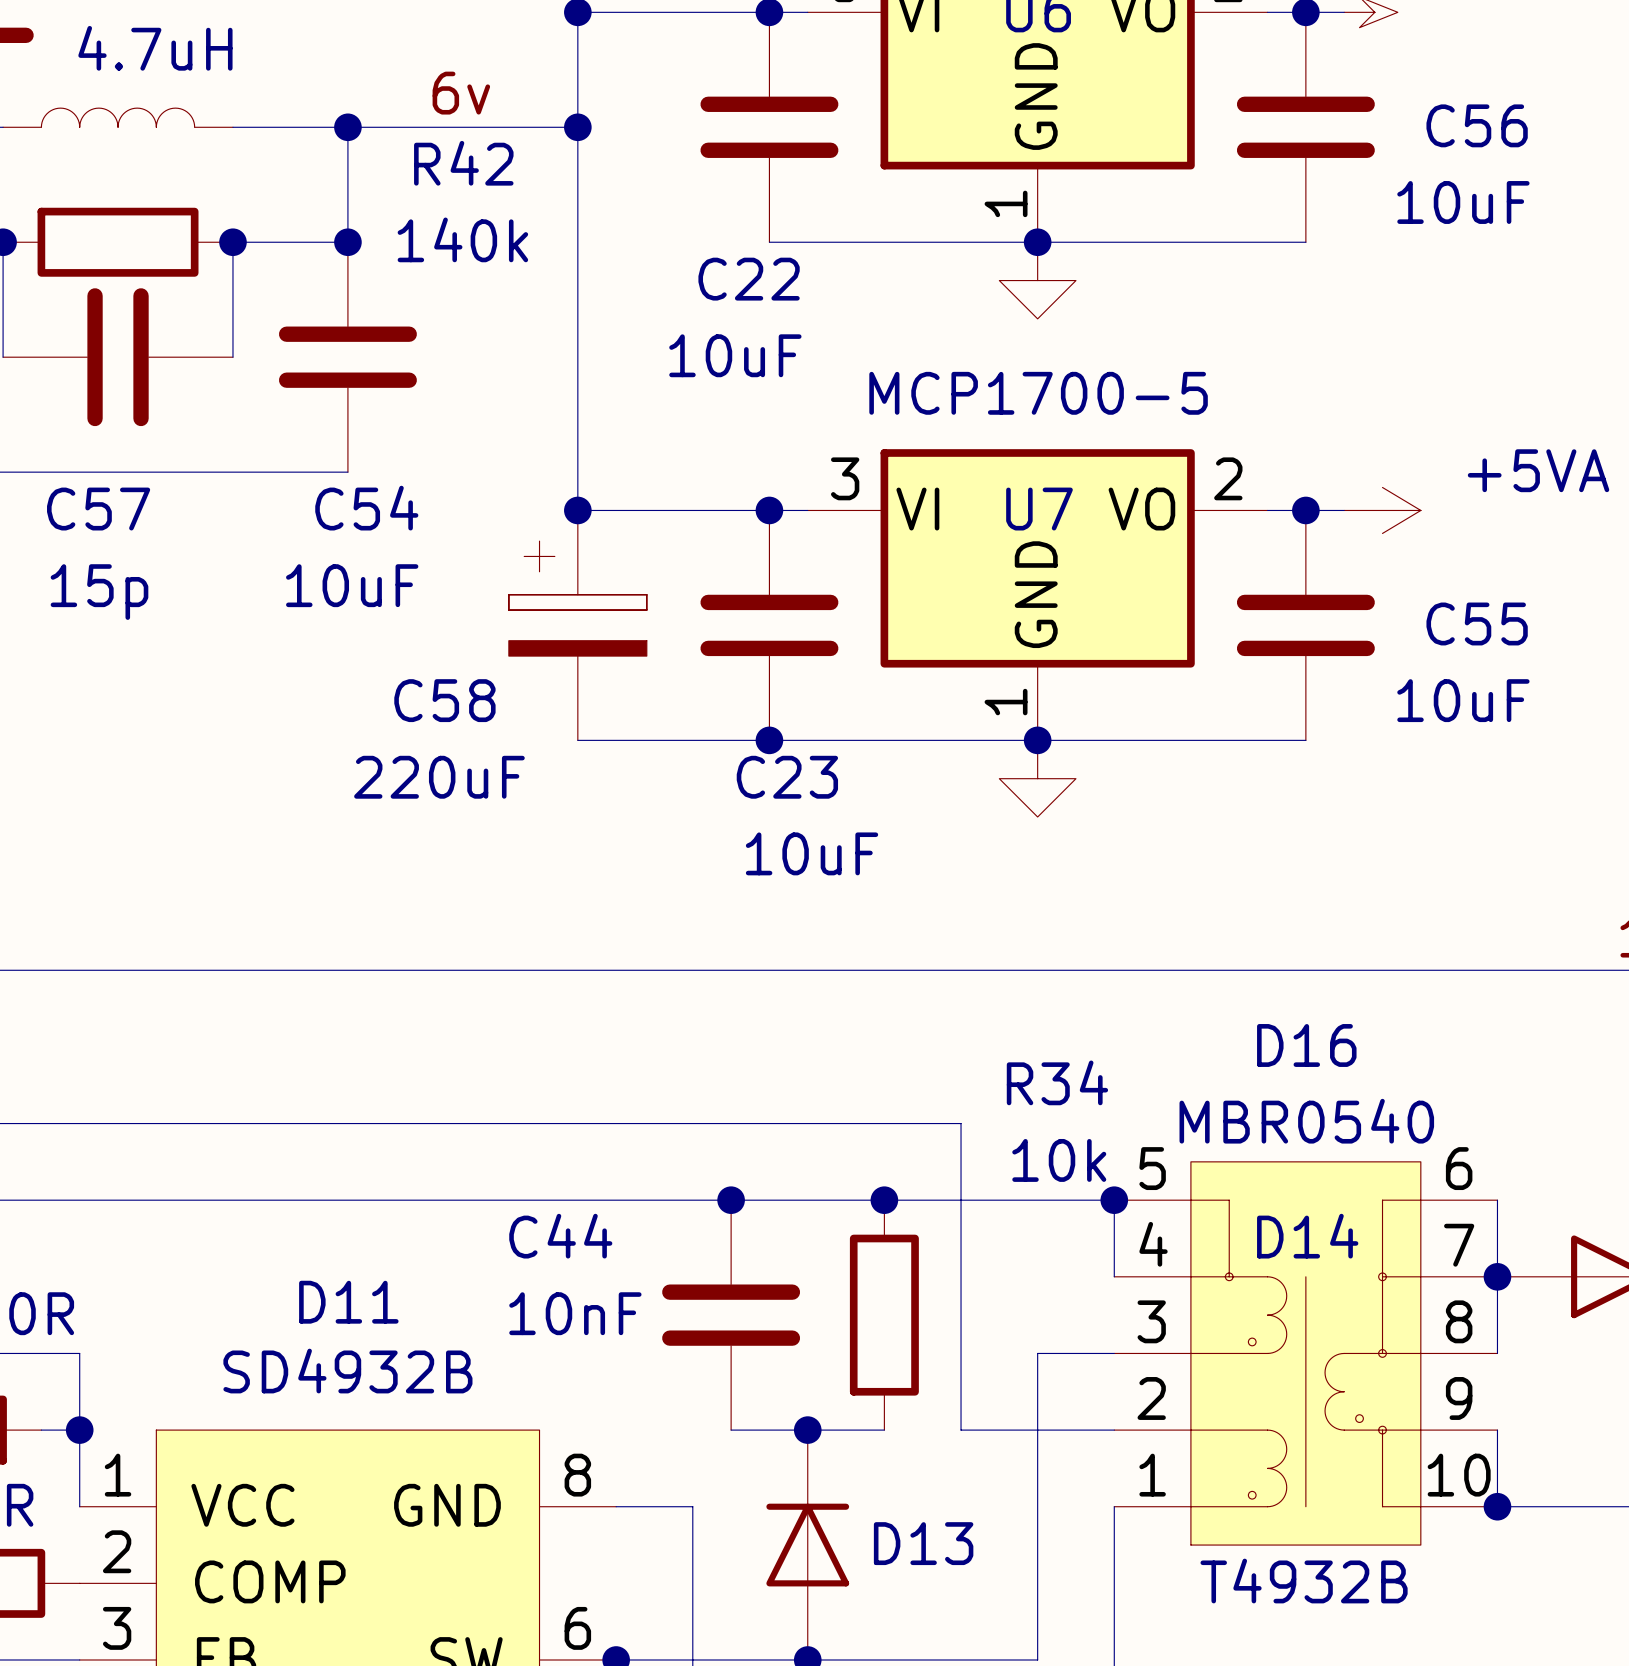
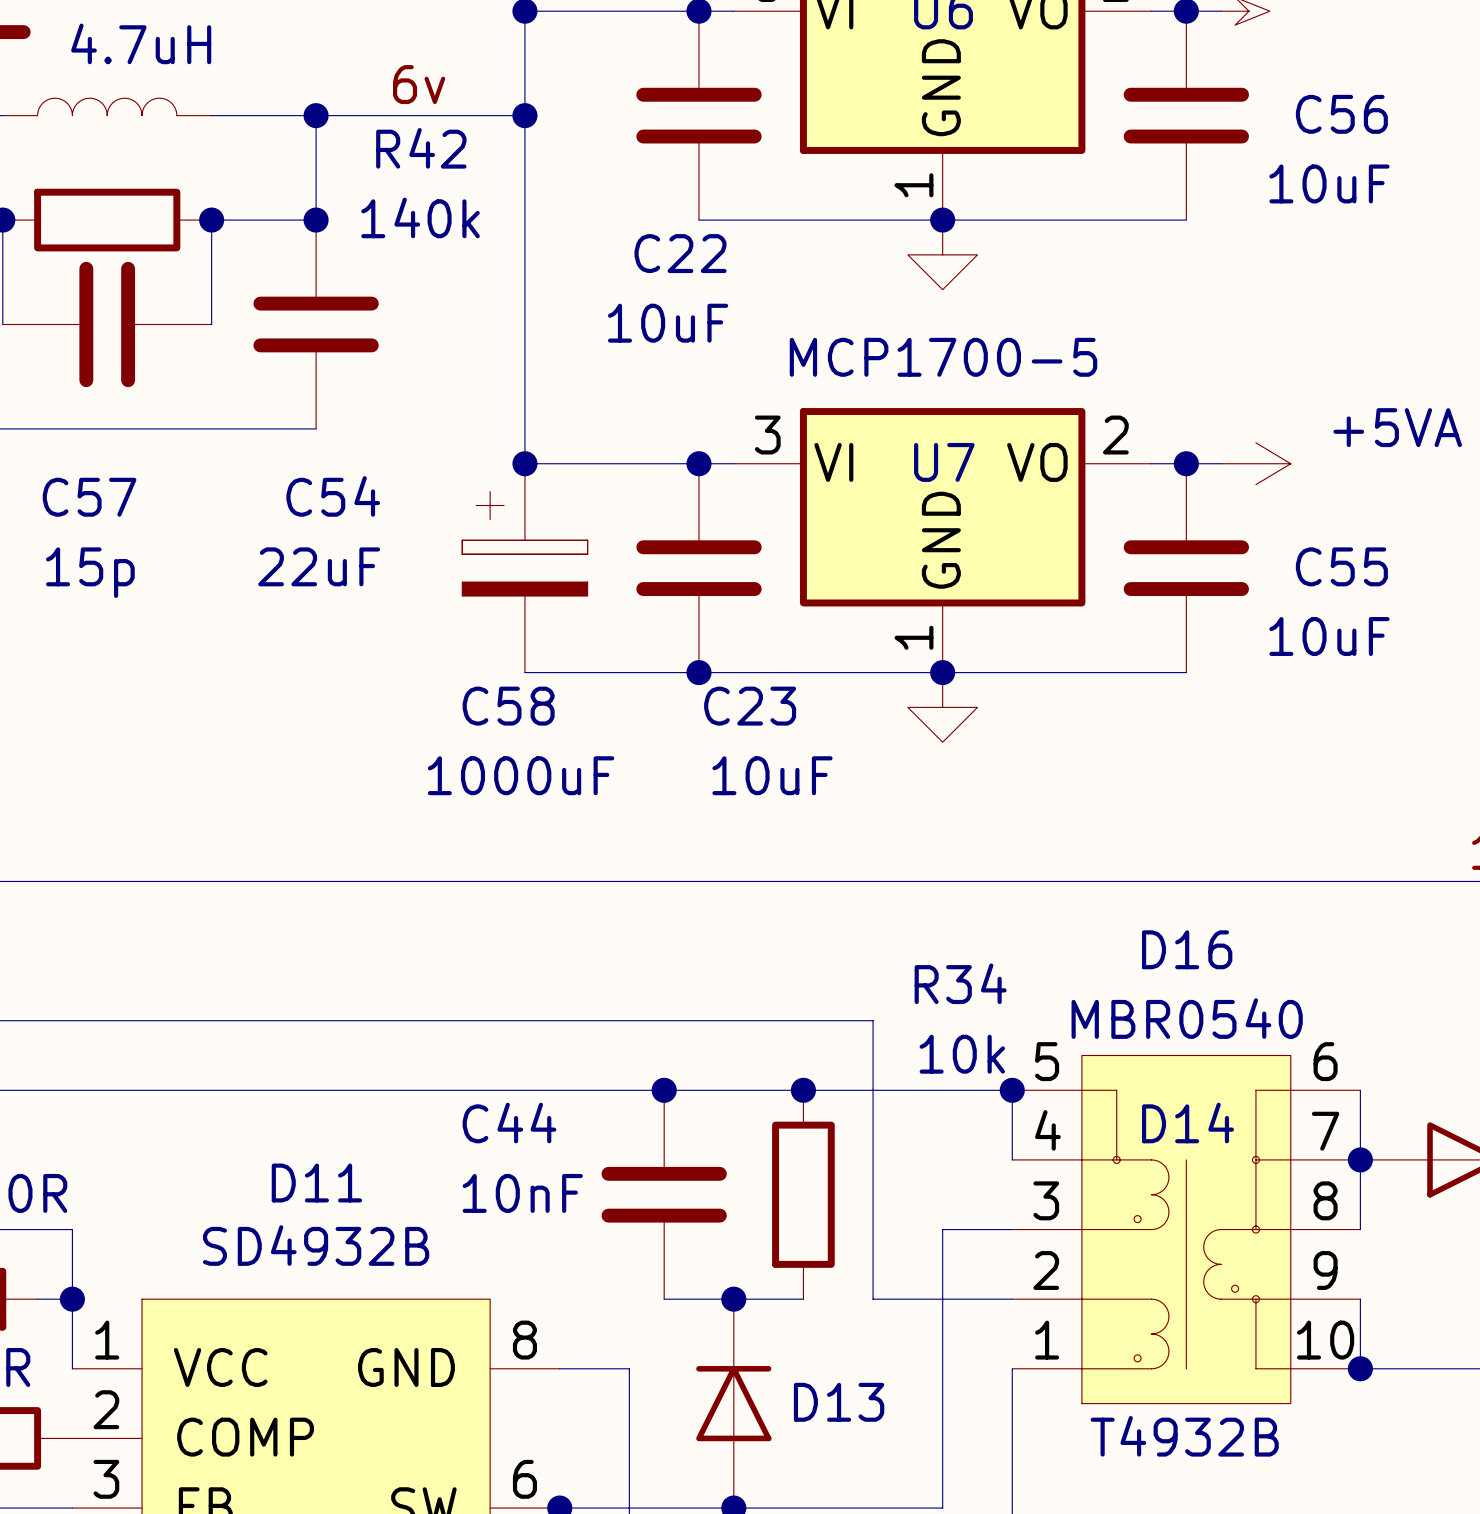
C54 name position: C54 (366, 508) -> C54 (333, 496)
C57 name position: C57 (98, 509) -> C57 (89, 497)
C54 value: 10uF (352, 585) -> 22uF (319, 566)
C57 value position: 15p (99, 592) -> 15p (90, 572)
C58 name position: C58 (444, 700) -> C58 (508, 706)
C58 value: 220uF (439, 777) -> 1000uF (521, 775)
C23 name position: C23 (787, 777) -> C23 (750, 706)
C23 value position: 10uF (812, 853) -> 10uF (772, 775)

